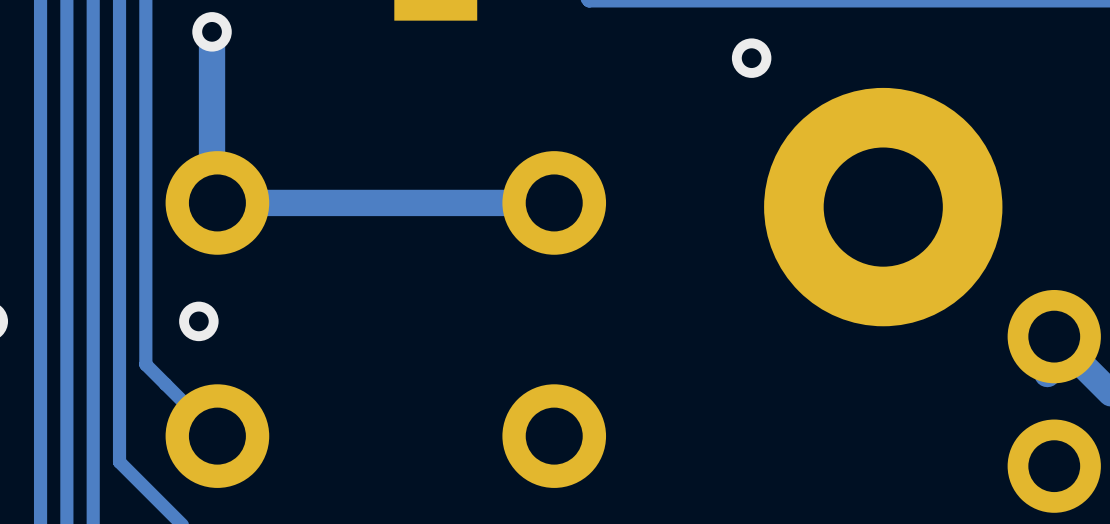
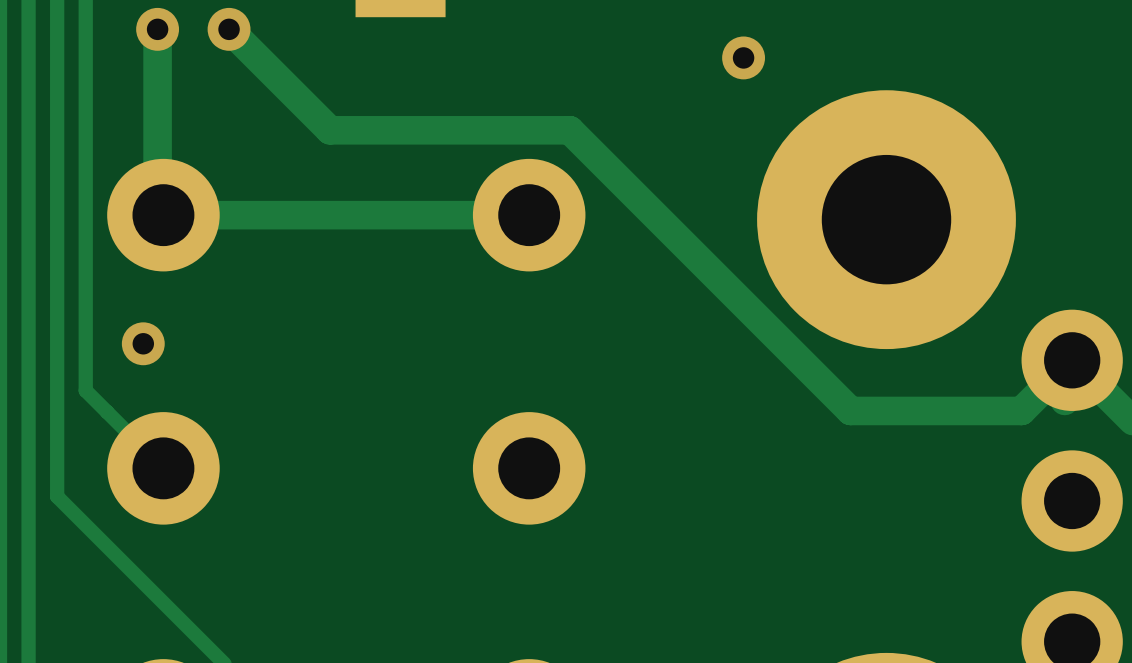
track: none -> (229, 29) (329, 130) (569, 130) (850, 410) (1021, 410) (1072, 360)
via: none -> (229, 29)

